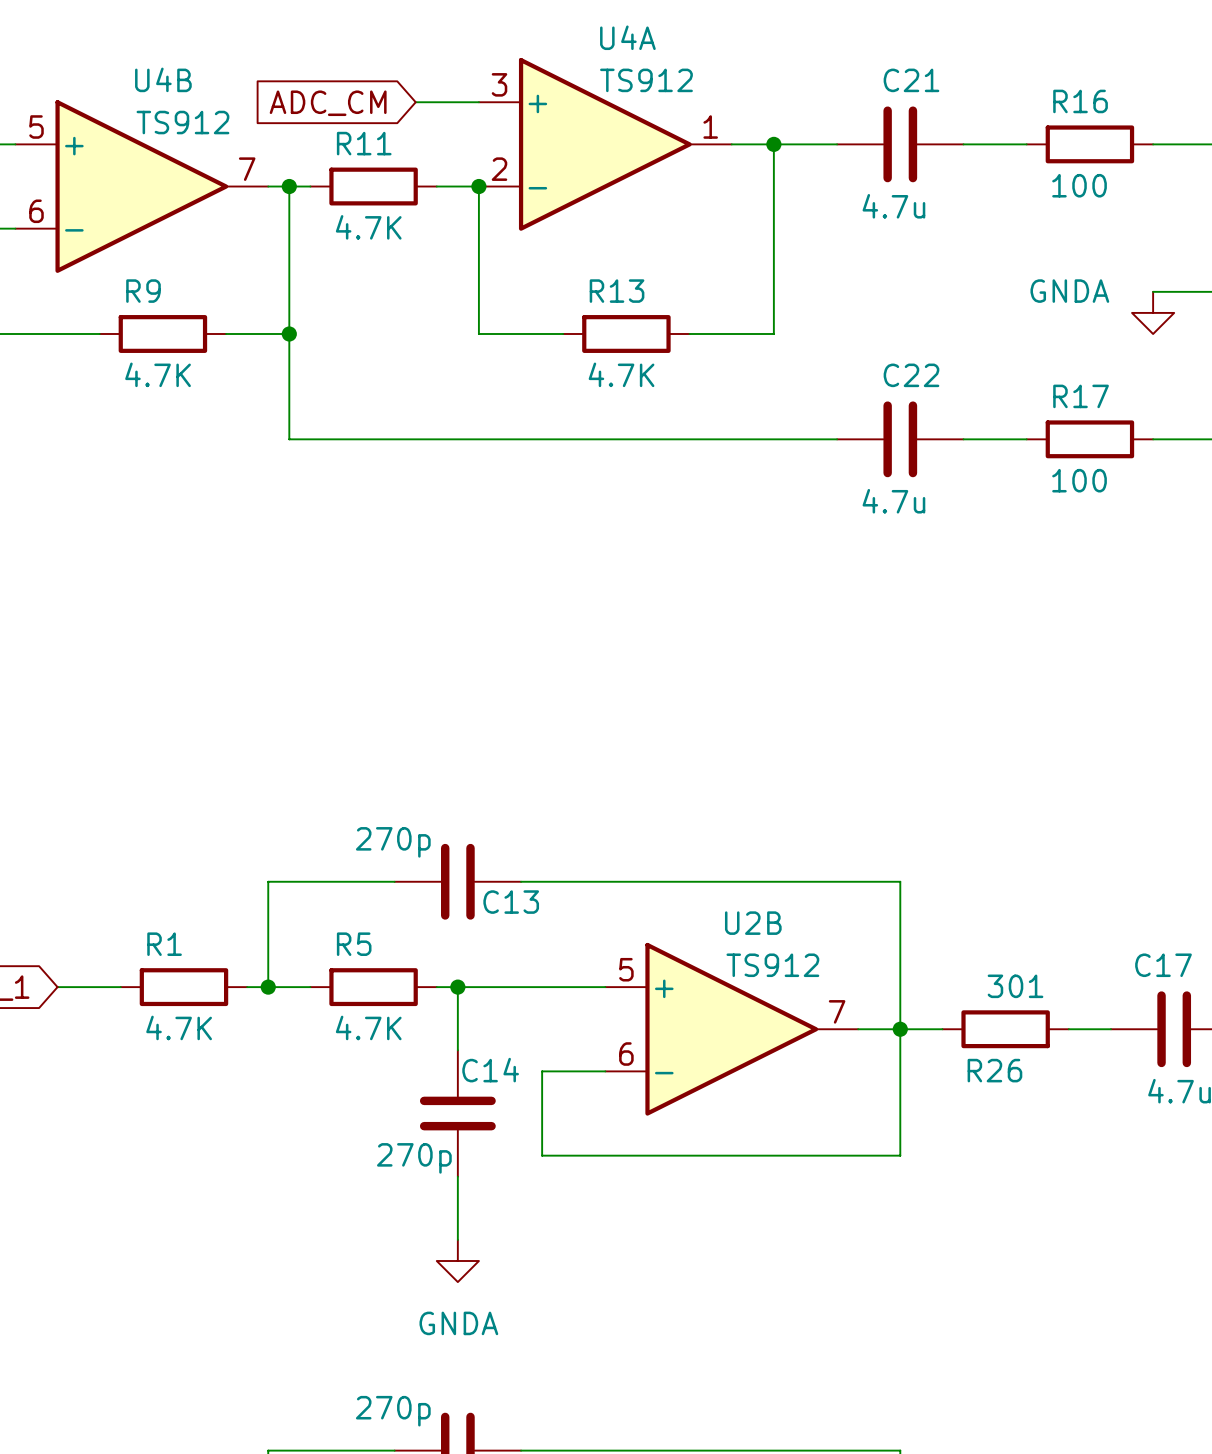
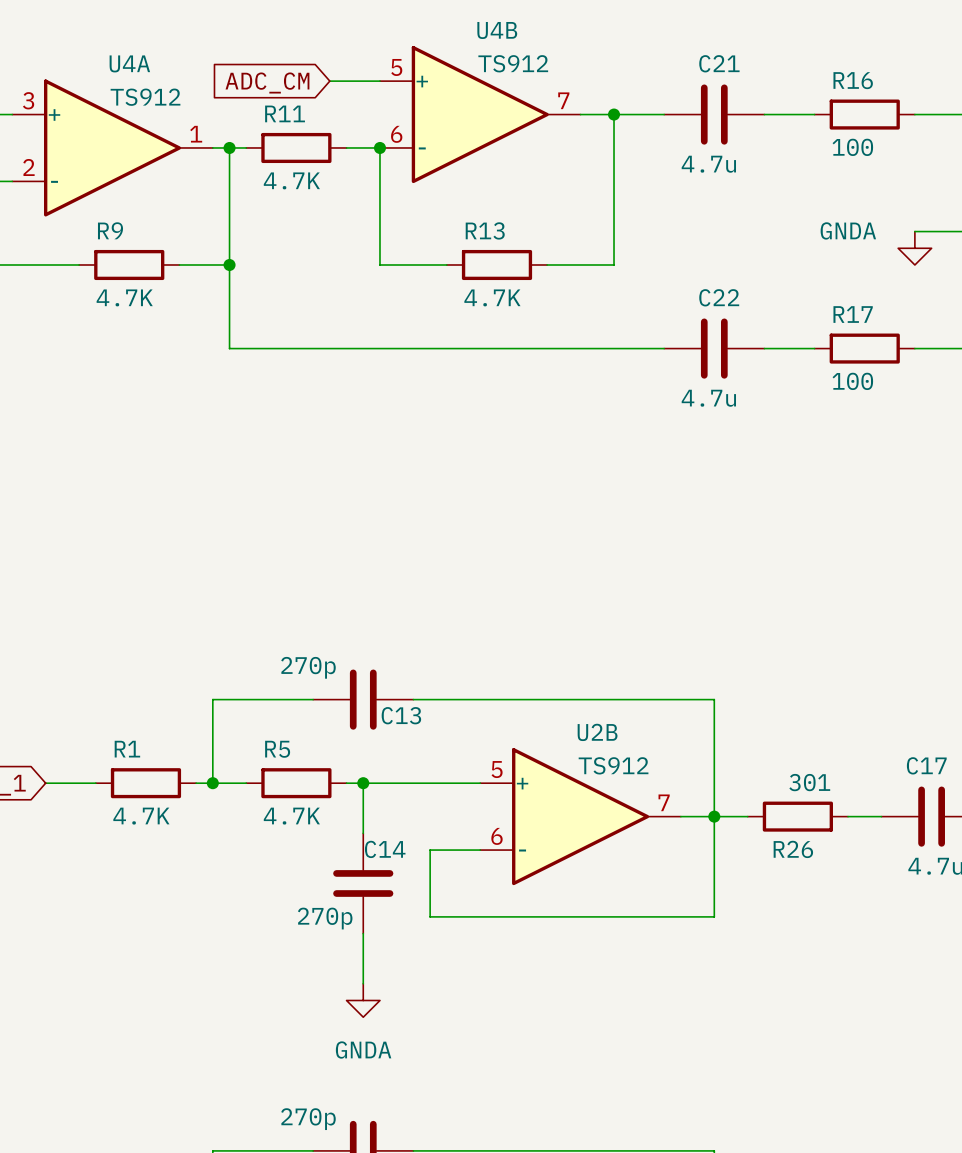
U4A position: (605, 144) -> (112, 147)
U4B position: (141, 186) -> (480, 114)

